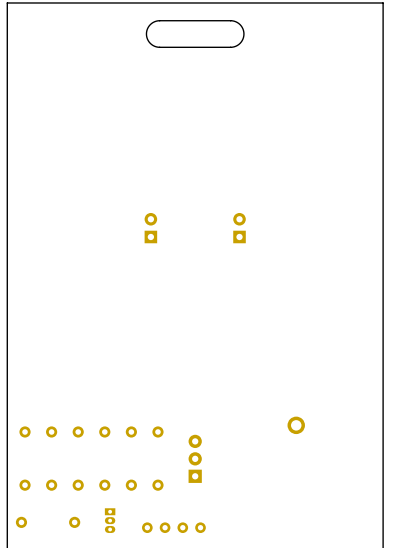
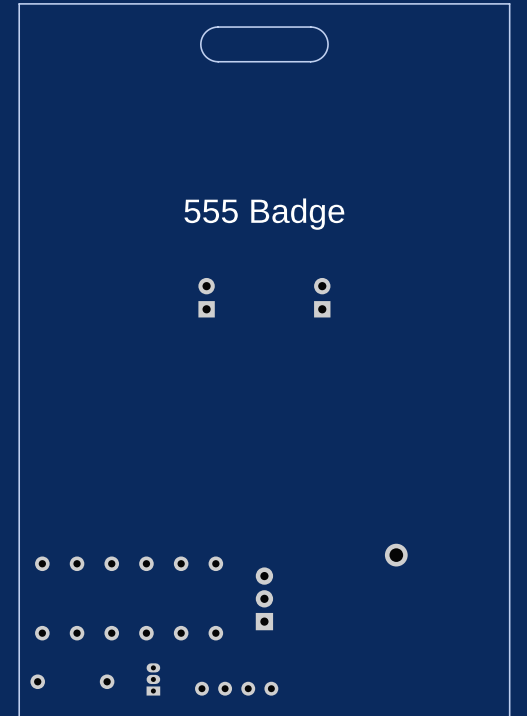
text: none -> 555 Badge (264, 214)
part rotation: 0° (110, 520) -> 180° (153, 679)

